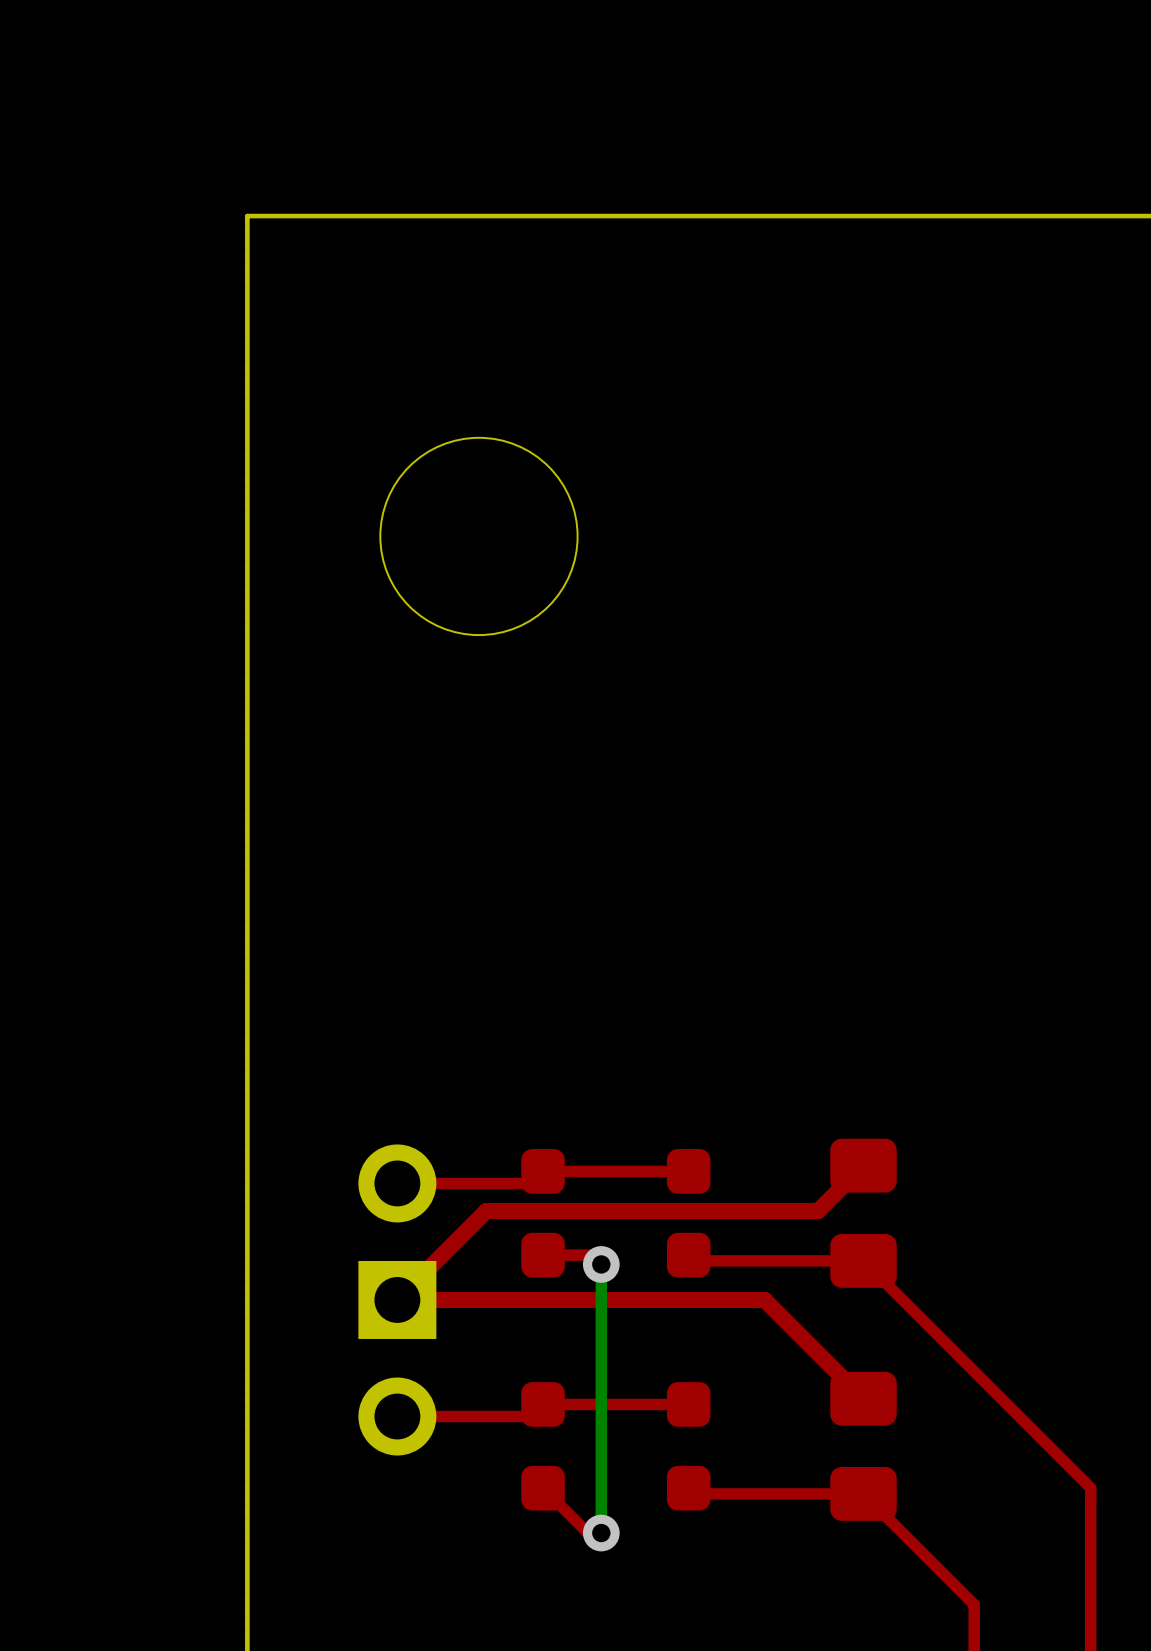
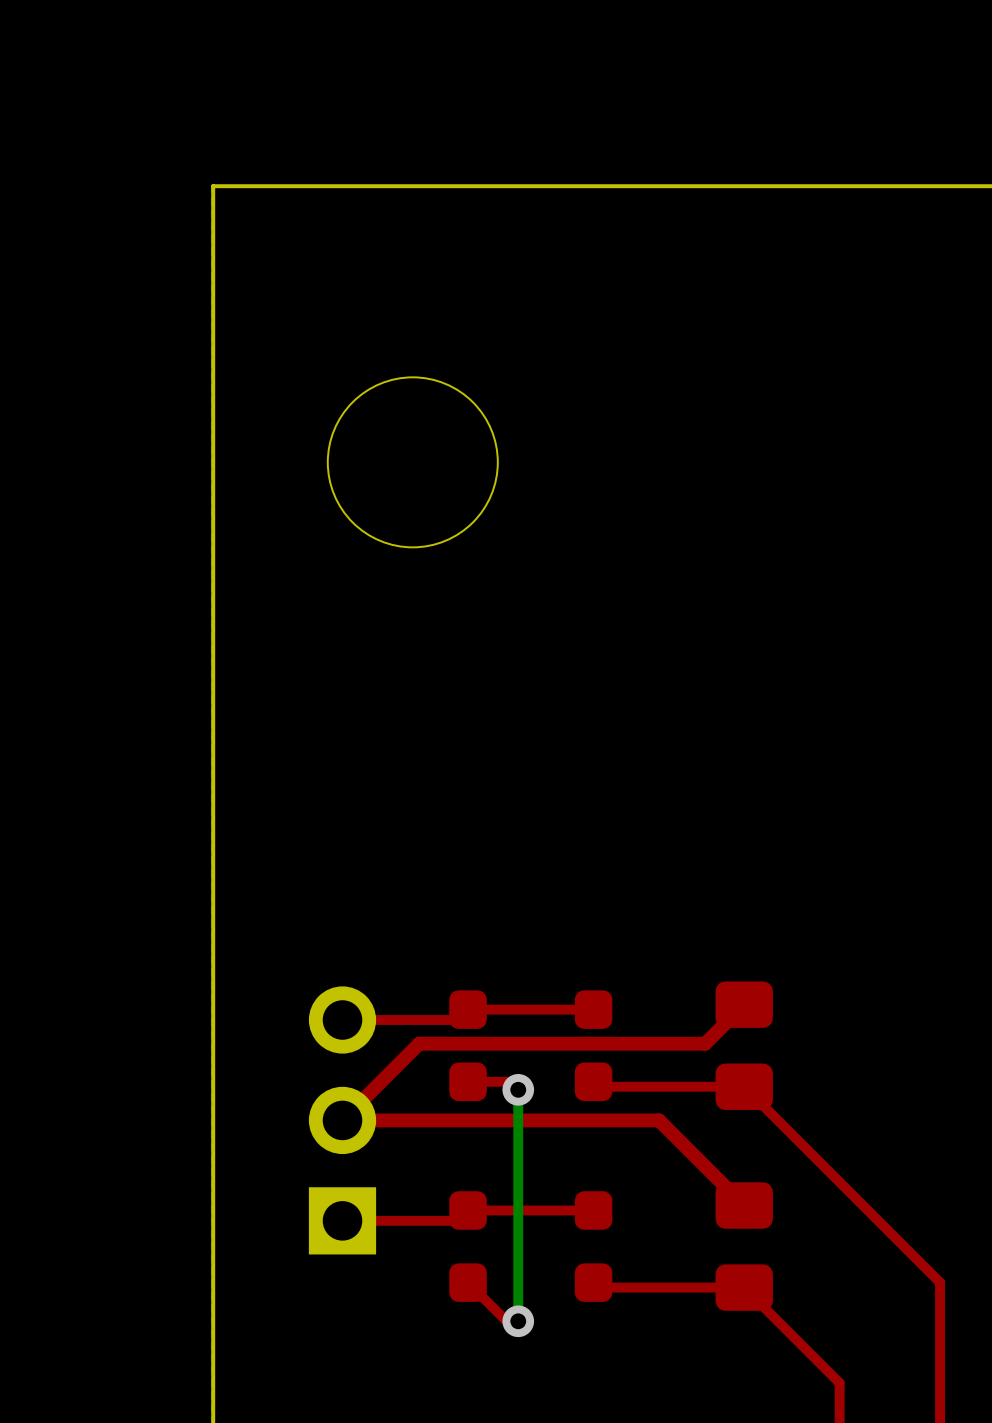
part footprint: [358, 1144, 437, 1456] -> [308, 986, 377, 1255]

